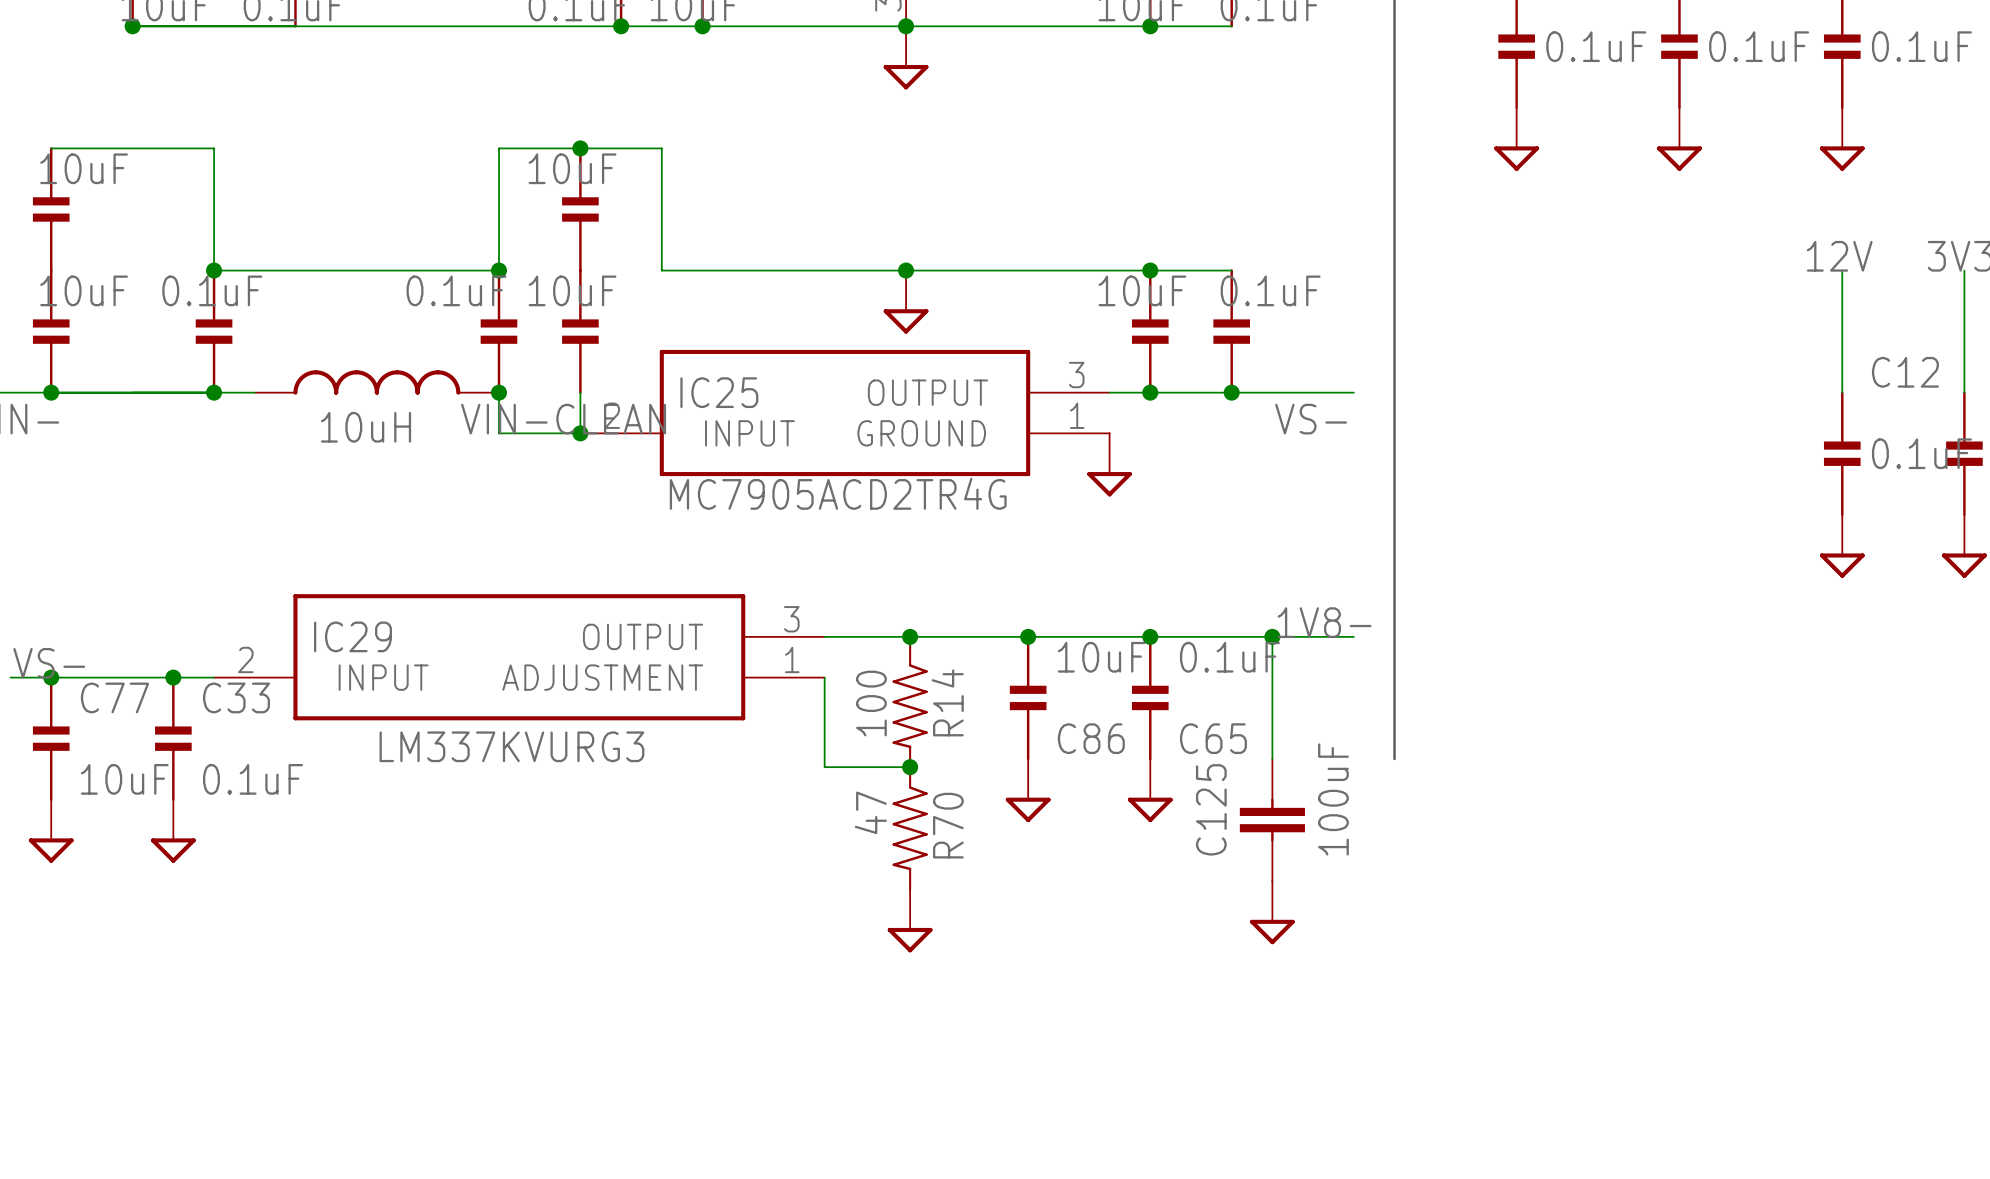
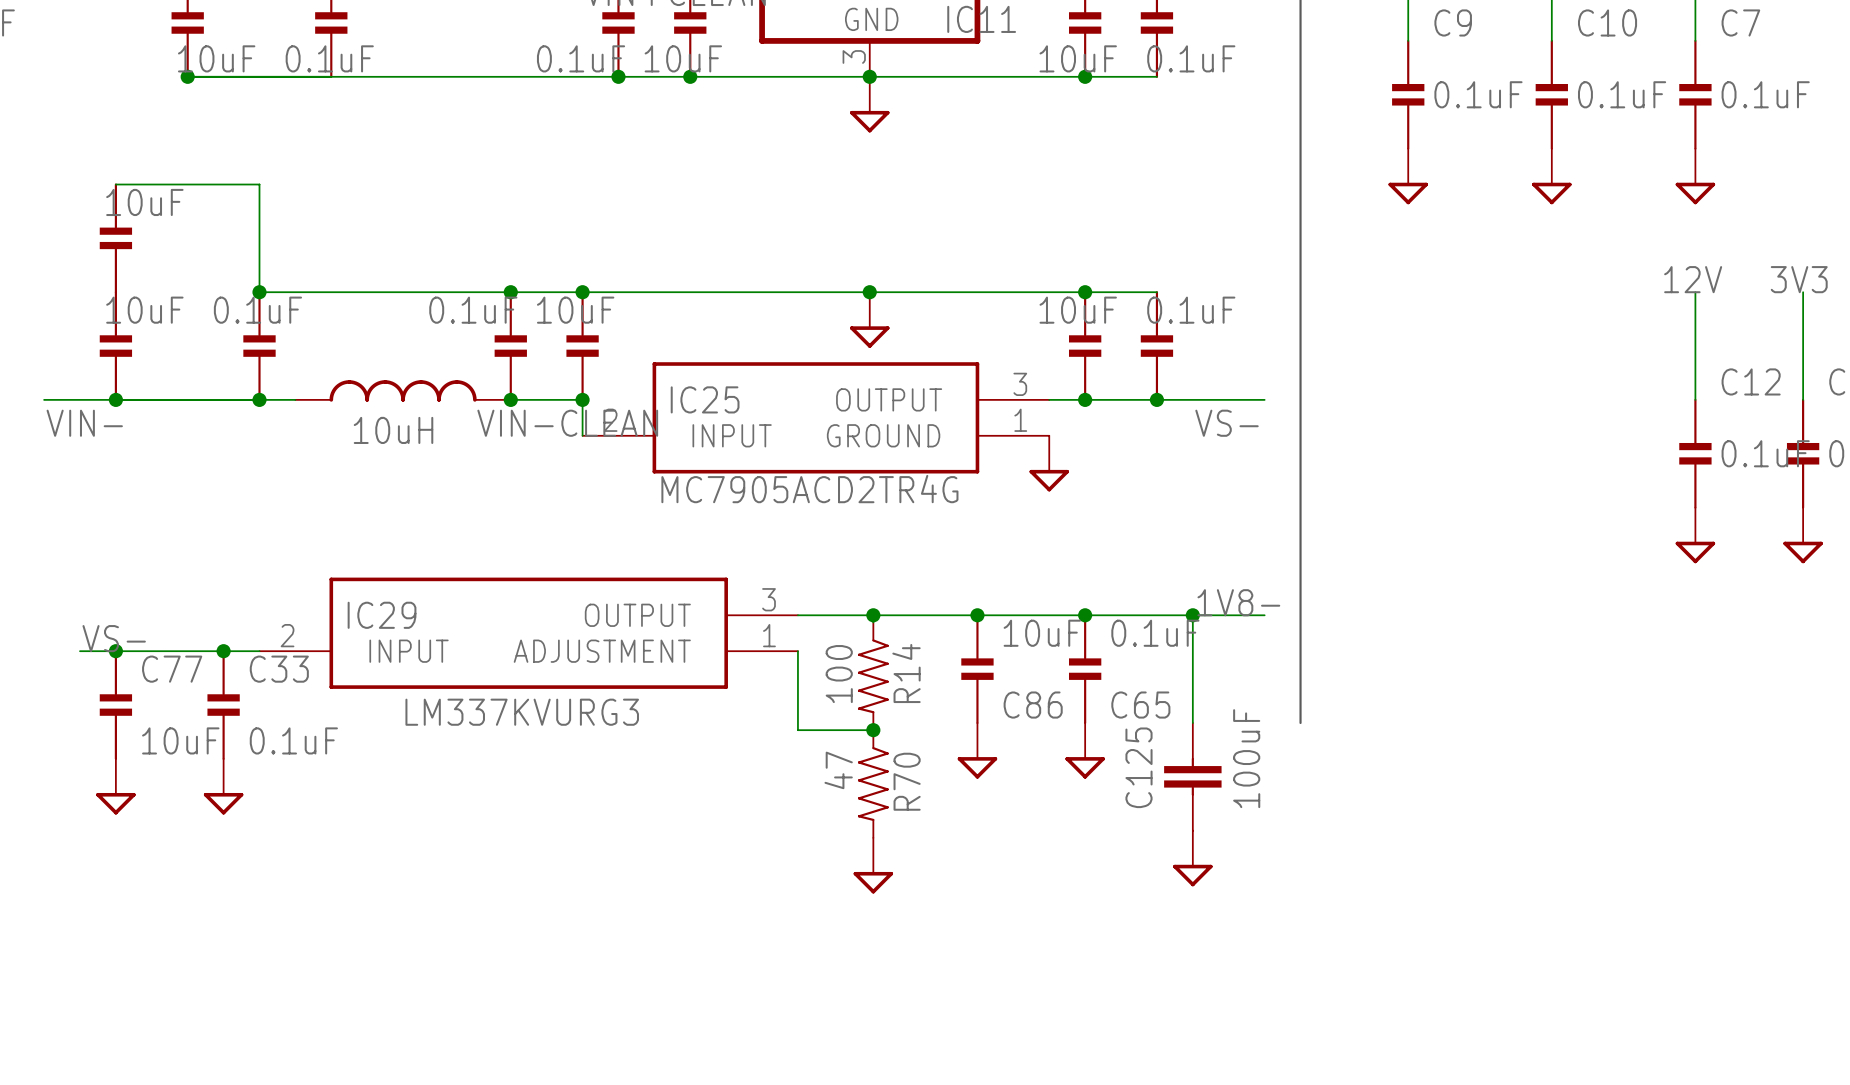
junction: (580, 148) -> none
part: 10uF (580, 209) -> none
wire: (498, 270) (498, 148) (661, 148) (661, 270) -> (510, 292) (654, 292)
junction: none -> (582, 292)
wire: (498, 392) (498, 433) (580, 433) -> (510, 399) (582, 399)
junction position: (580, 433) -> (582, 399)

